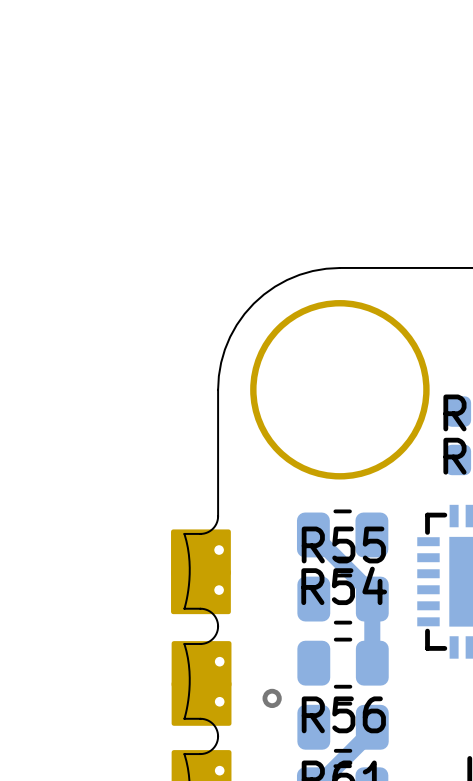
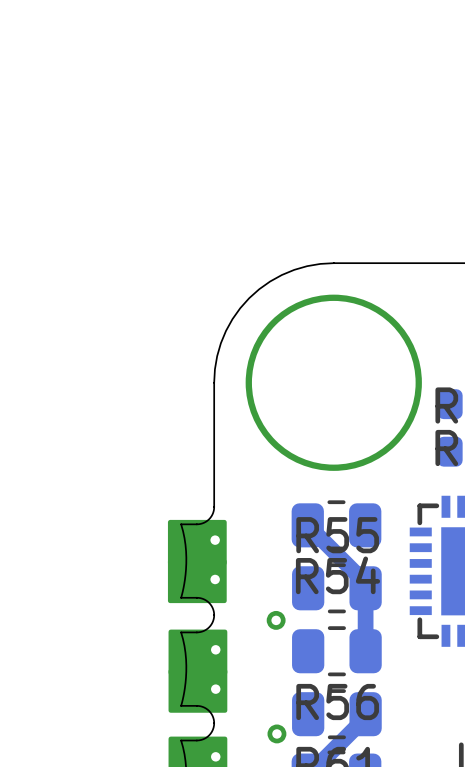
via: none -> (276, 620)
via: (272, 698) -> none
via: none -> (276, 733)

